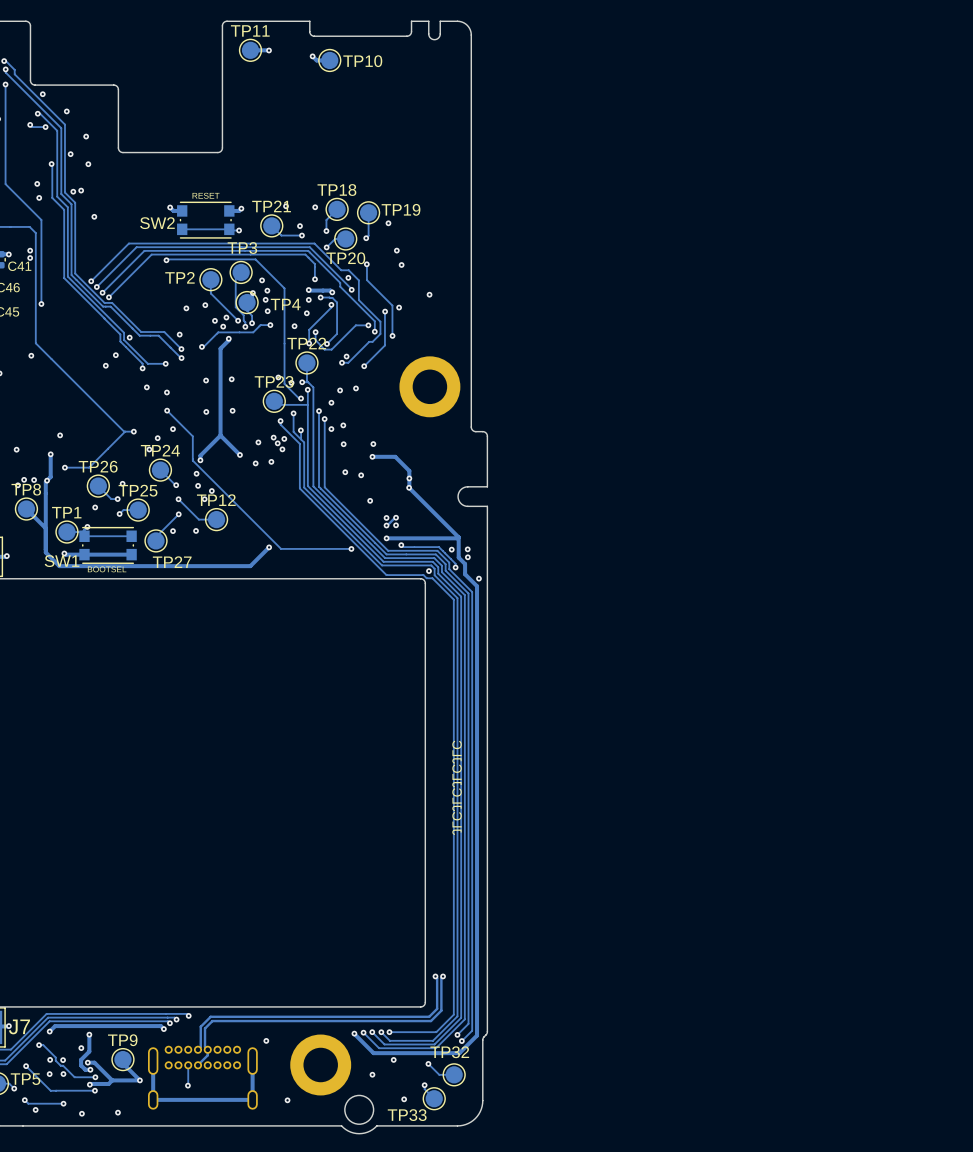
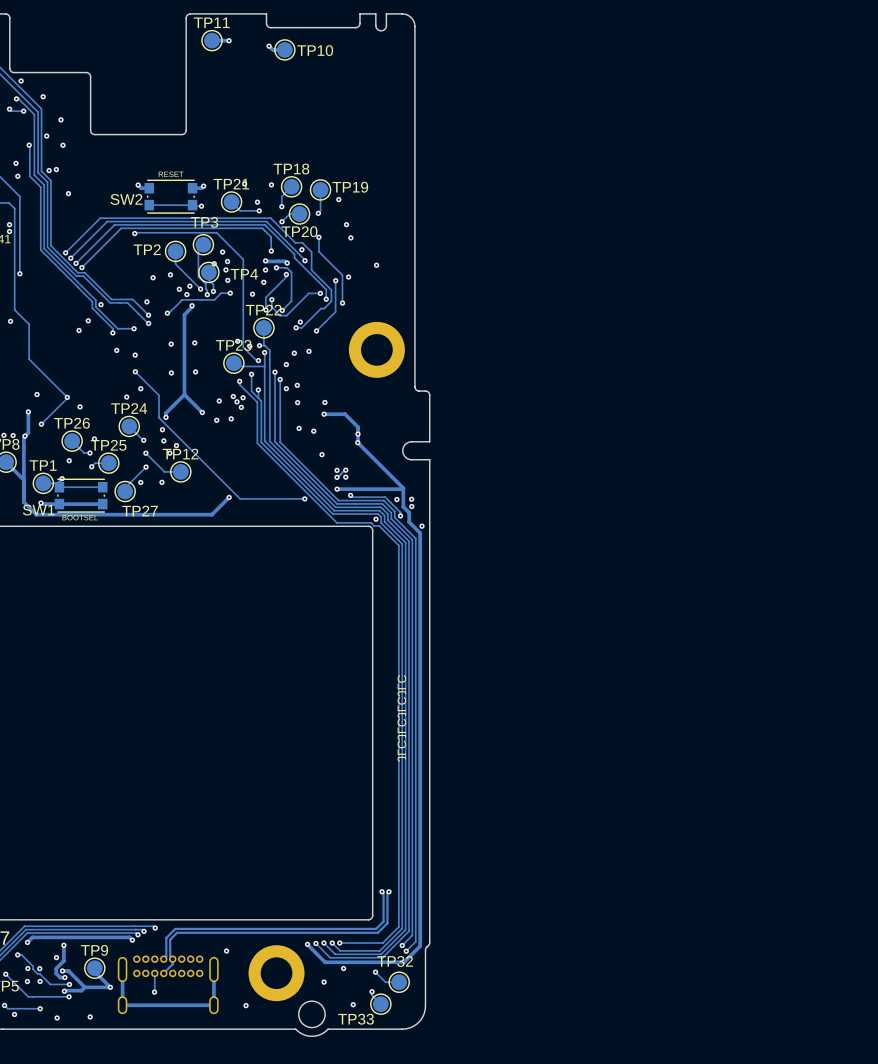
track: (51, 359) (124, 431) (133, 431) -> (29, 324) (29, 359) (67, 397) (41, 424)
track: (125, 431) (89, 467) (64, 467) -> none
via: (133, 431) -> none
via: none -> (67, 397)
via: none -> (80, 406)
via: (149, 449) -> none

